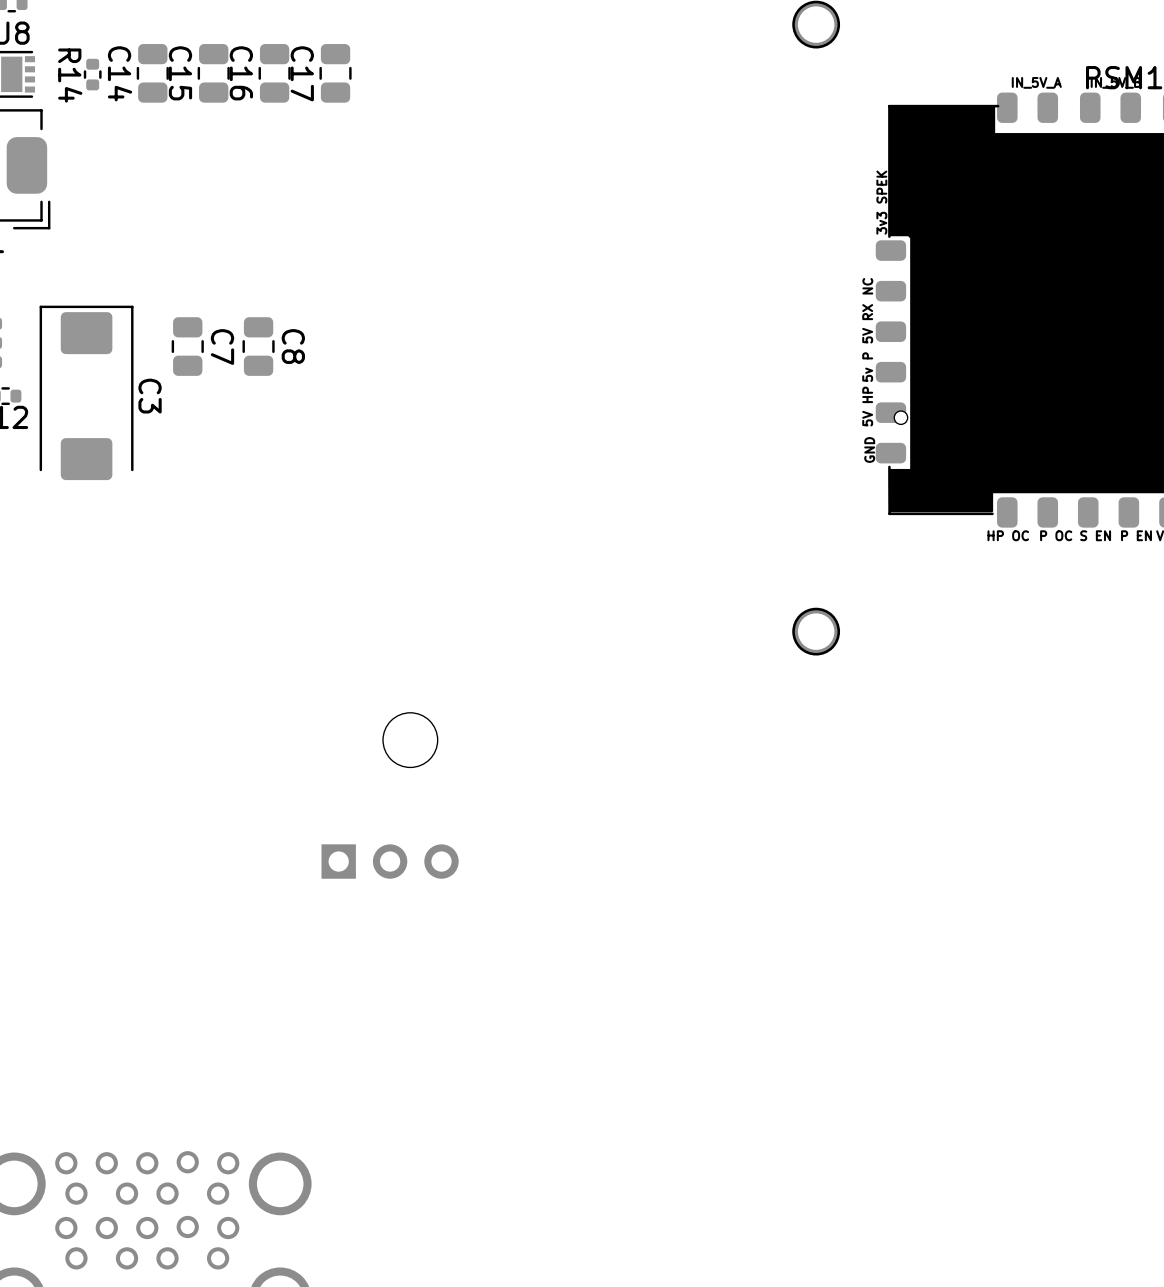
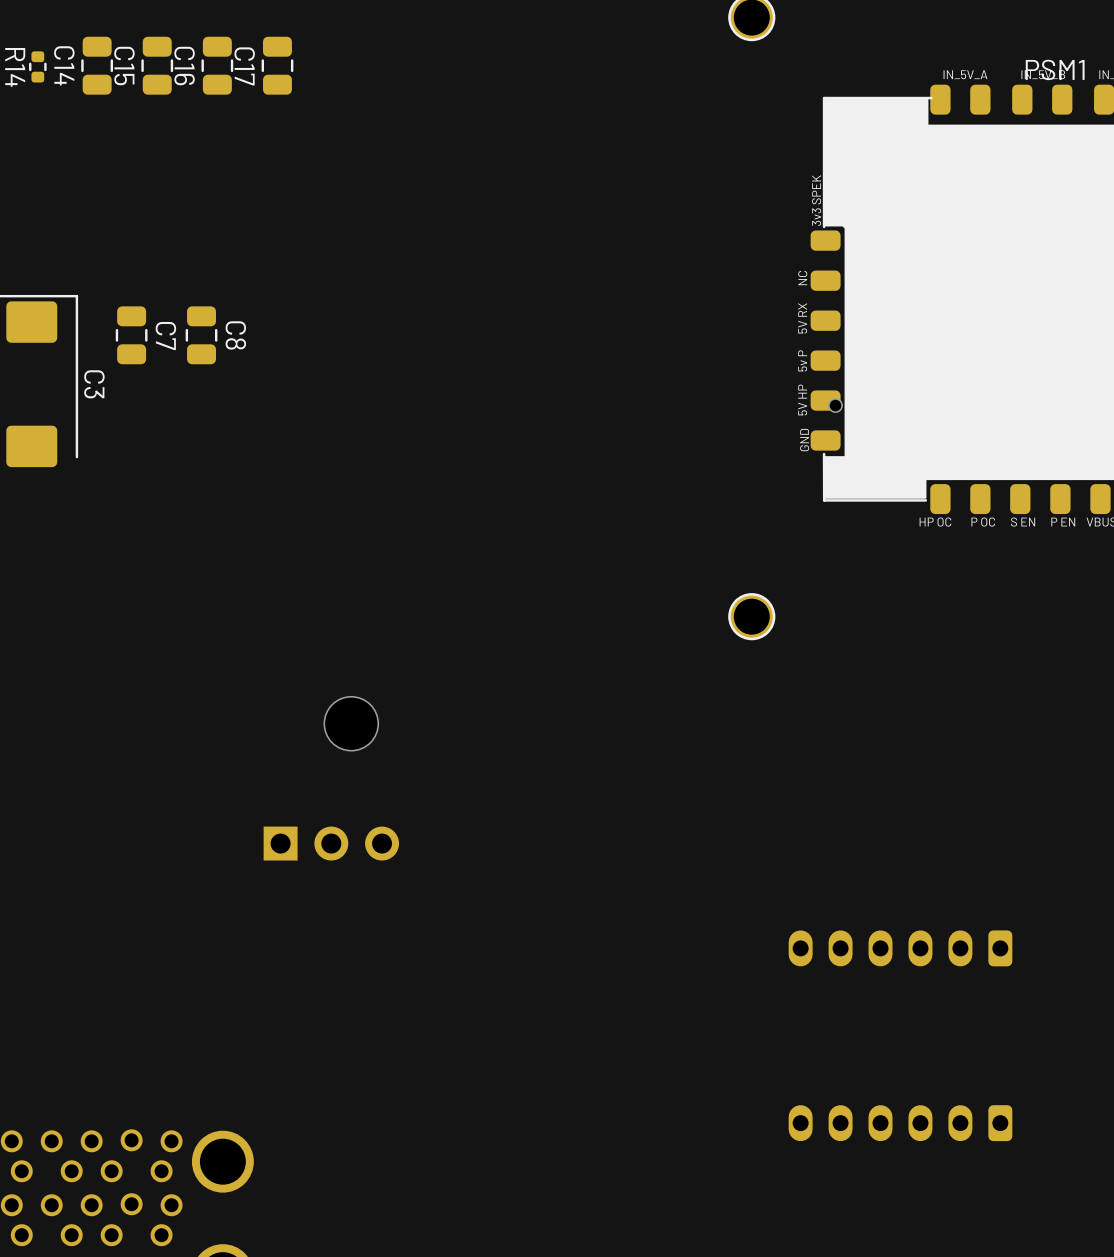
part: none -> (900, 948)
part: none -> (900, 1123)

